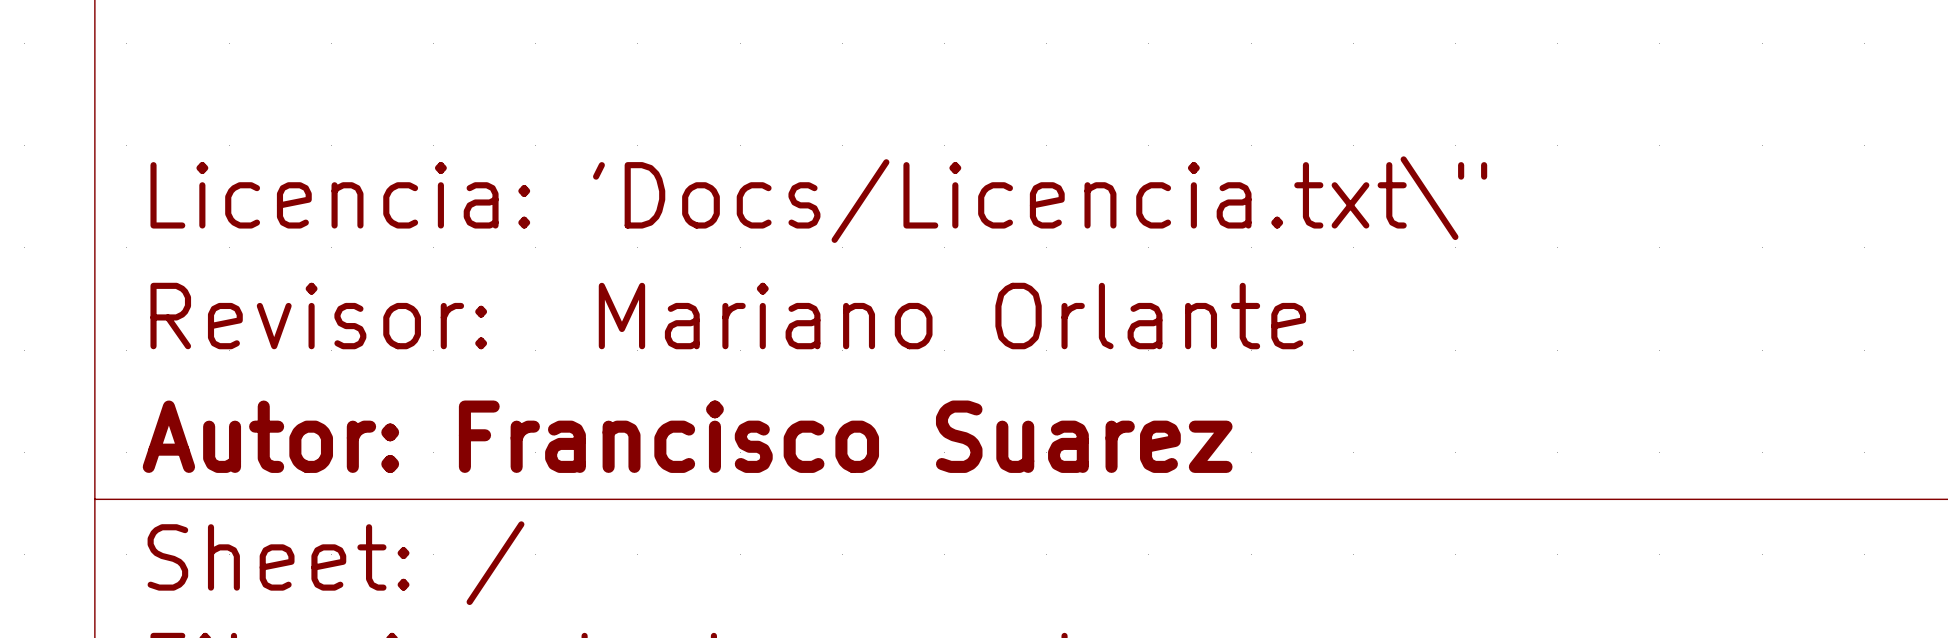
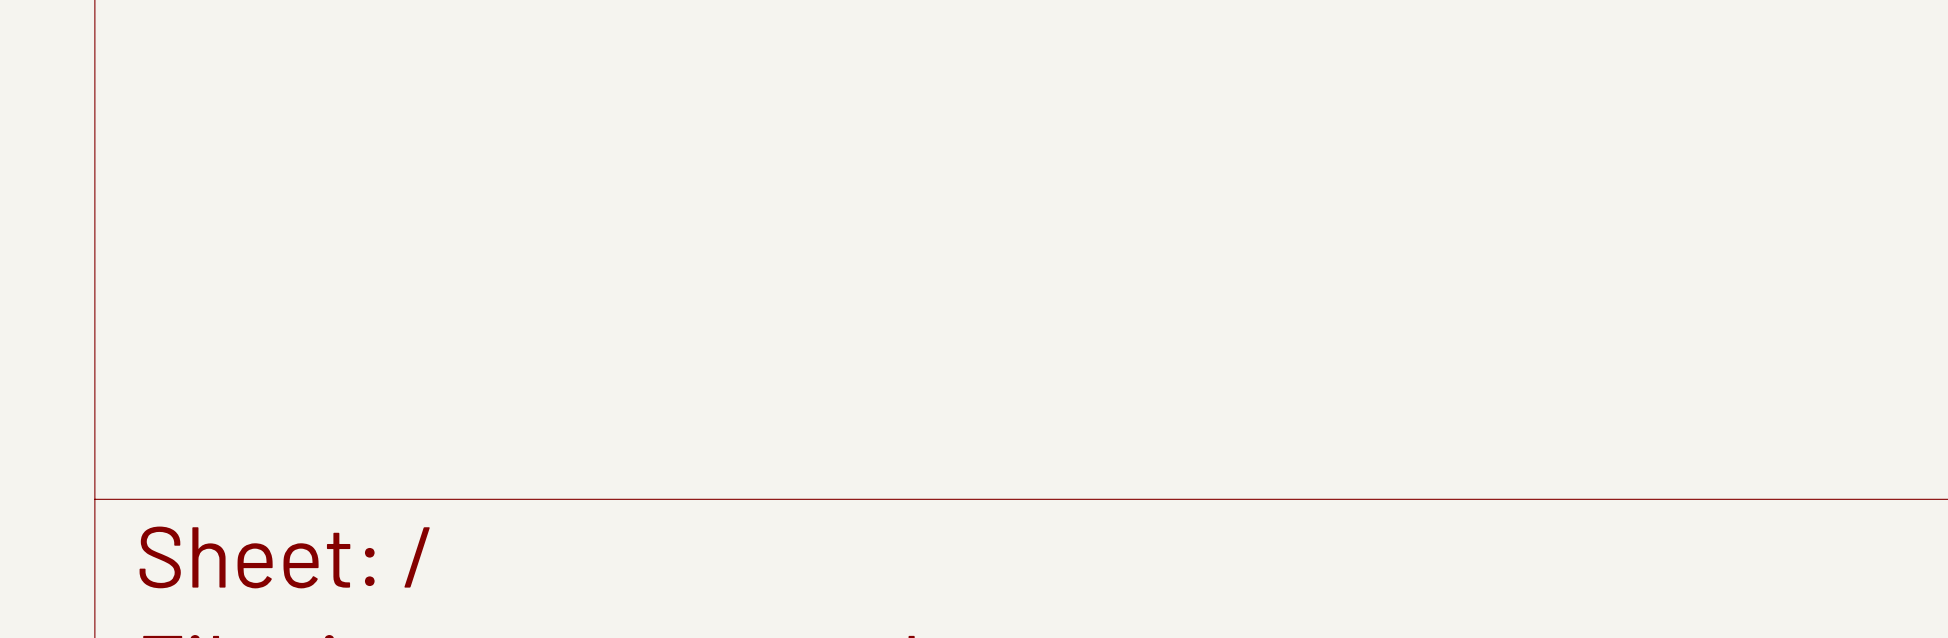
title block: Licencia: 'Docs/Licencia.txt\" (818, 199) -> none
title block: Revisor: Mariano Orlante (728, 316) -> none
title block: Autor: Francisco Suarez (687, 436) -> none

